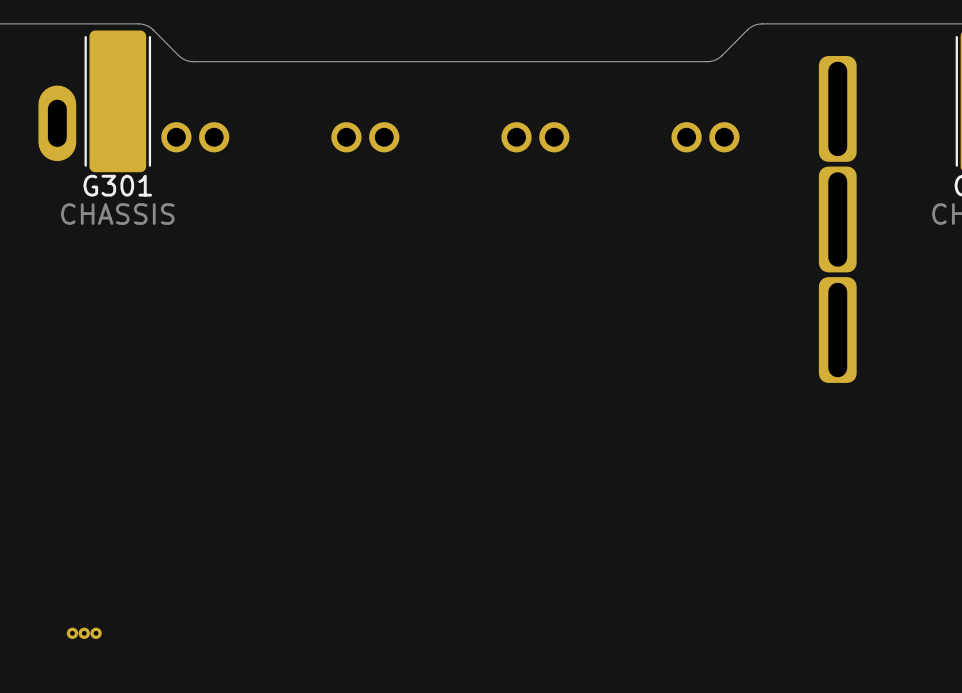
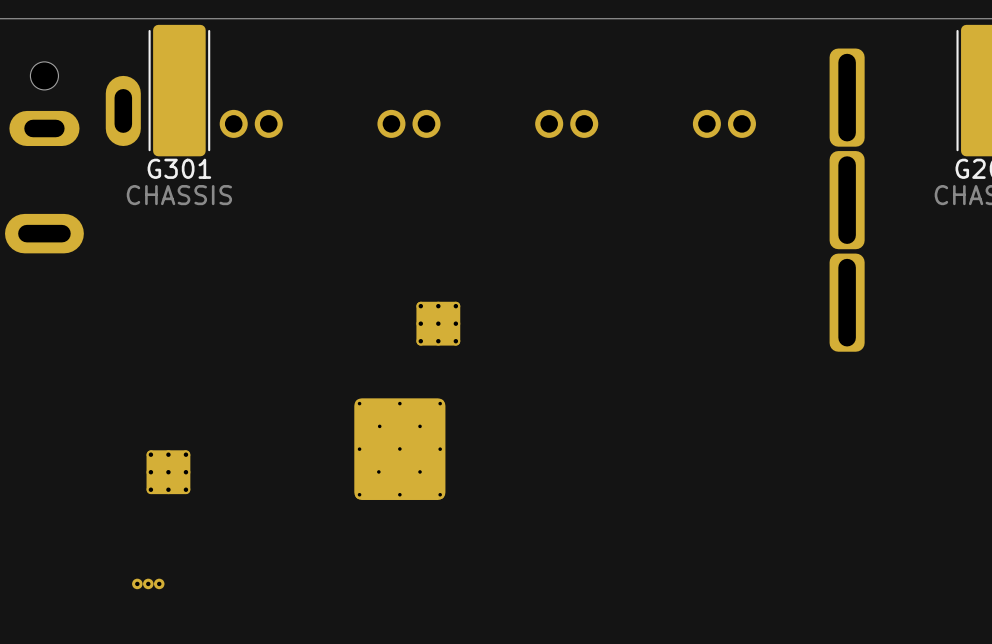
board edge: (762, 23) (749, 28) (720, 57) (707, 61) (190, 61) (180, 57) (151, 28) (138, 23) -> (777, 18) (198, 18)
part: none -> (438, 323)
part: none -> (399, 449)
part: none -> (168, 472)

